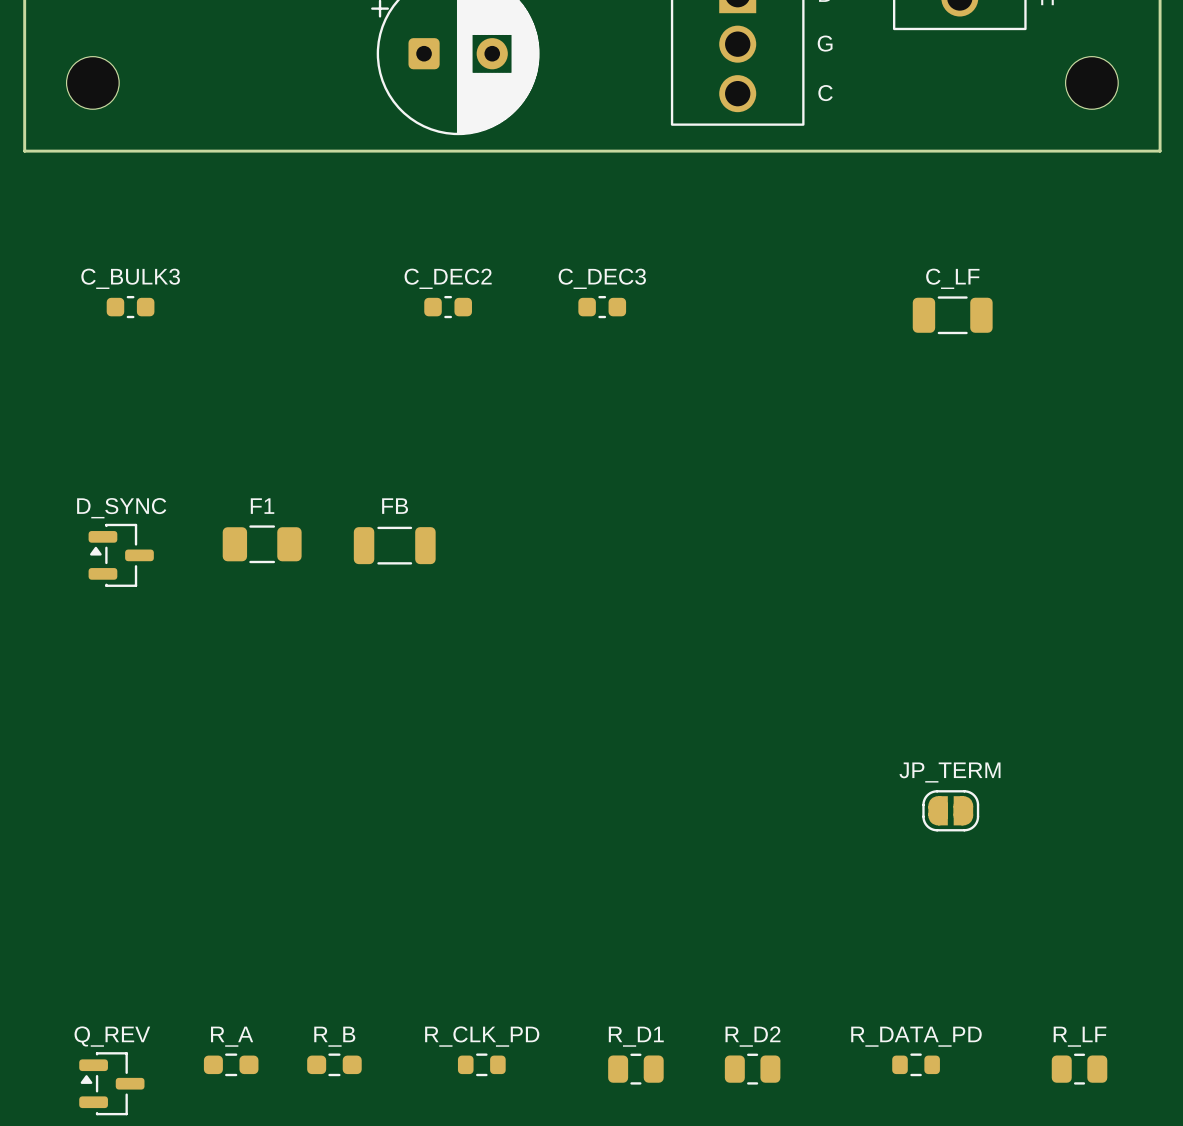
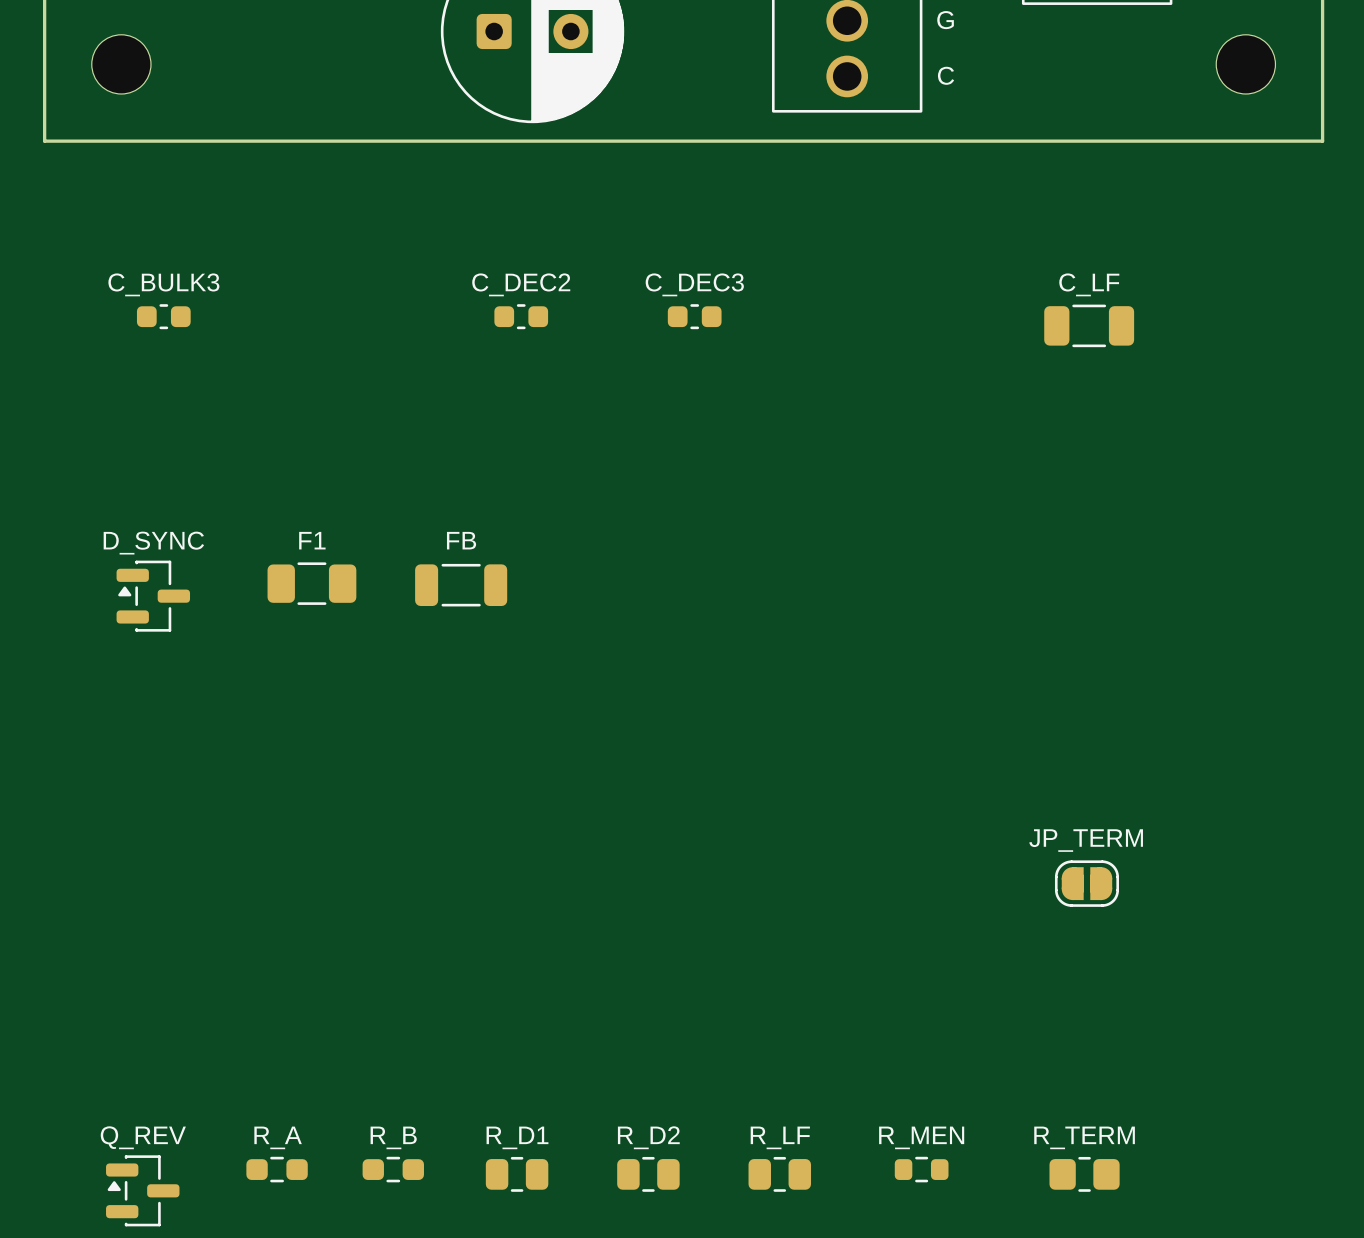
R_CLK_PD: (481, 1064) -> none
R_MEN: none -> (921, 1169)
R_DATA_PD: (916, 1064) -> none
R_D1 position: (635, 1069) -> (517, 1174)
R_D2 position: (752, 1069) -> (648, 1174)
R_TERM: none -> (1084, 1174)
R_LF position: (1079, 1069) -> (779, 1174)

